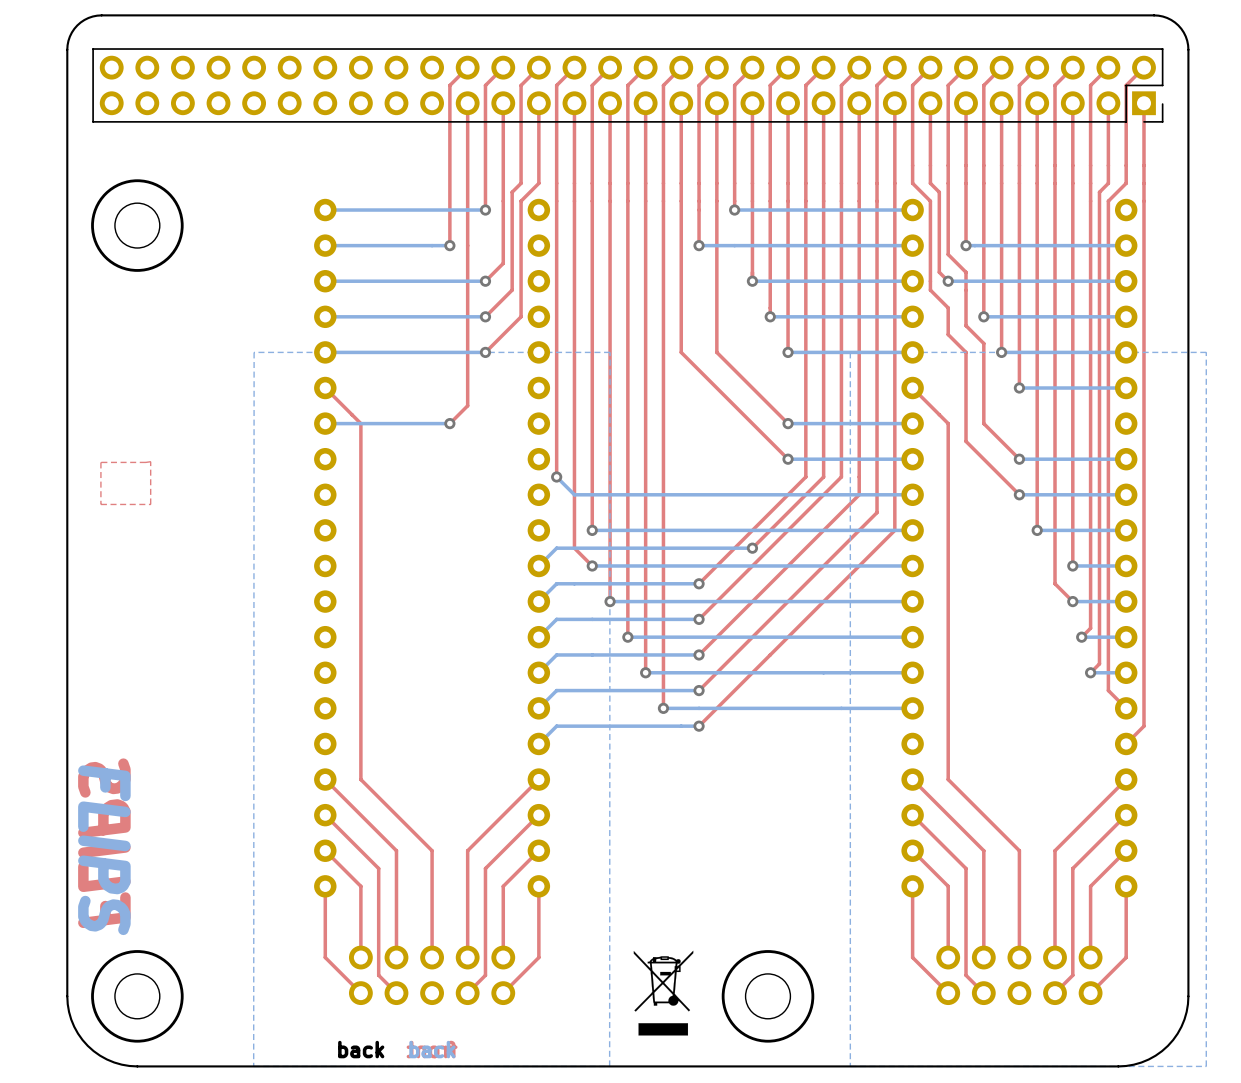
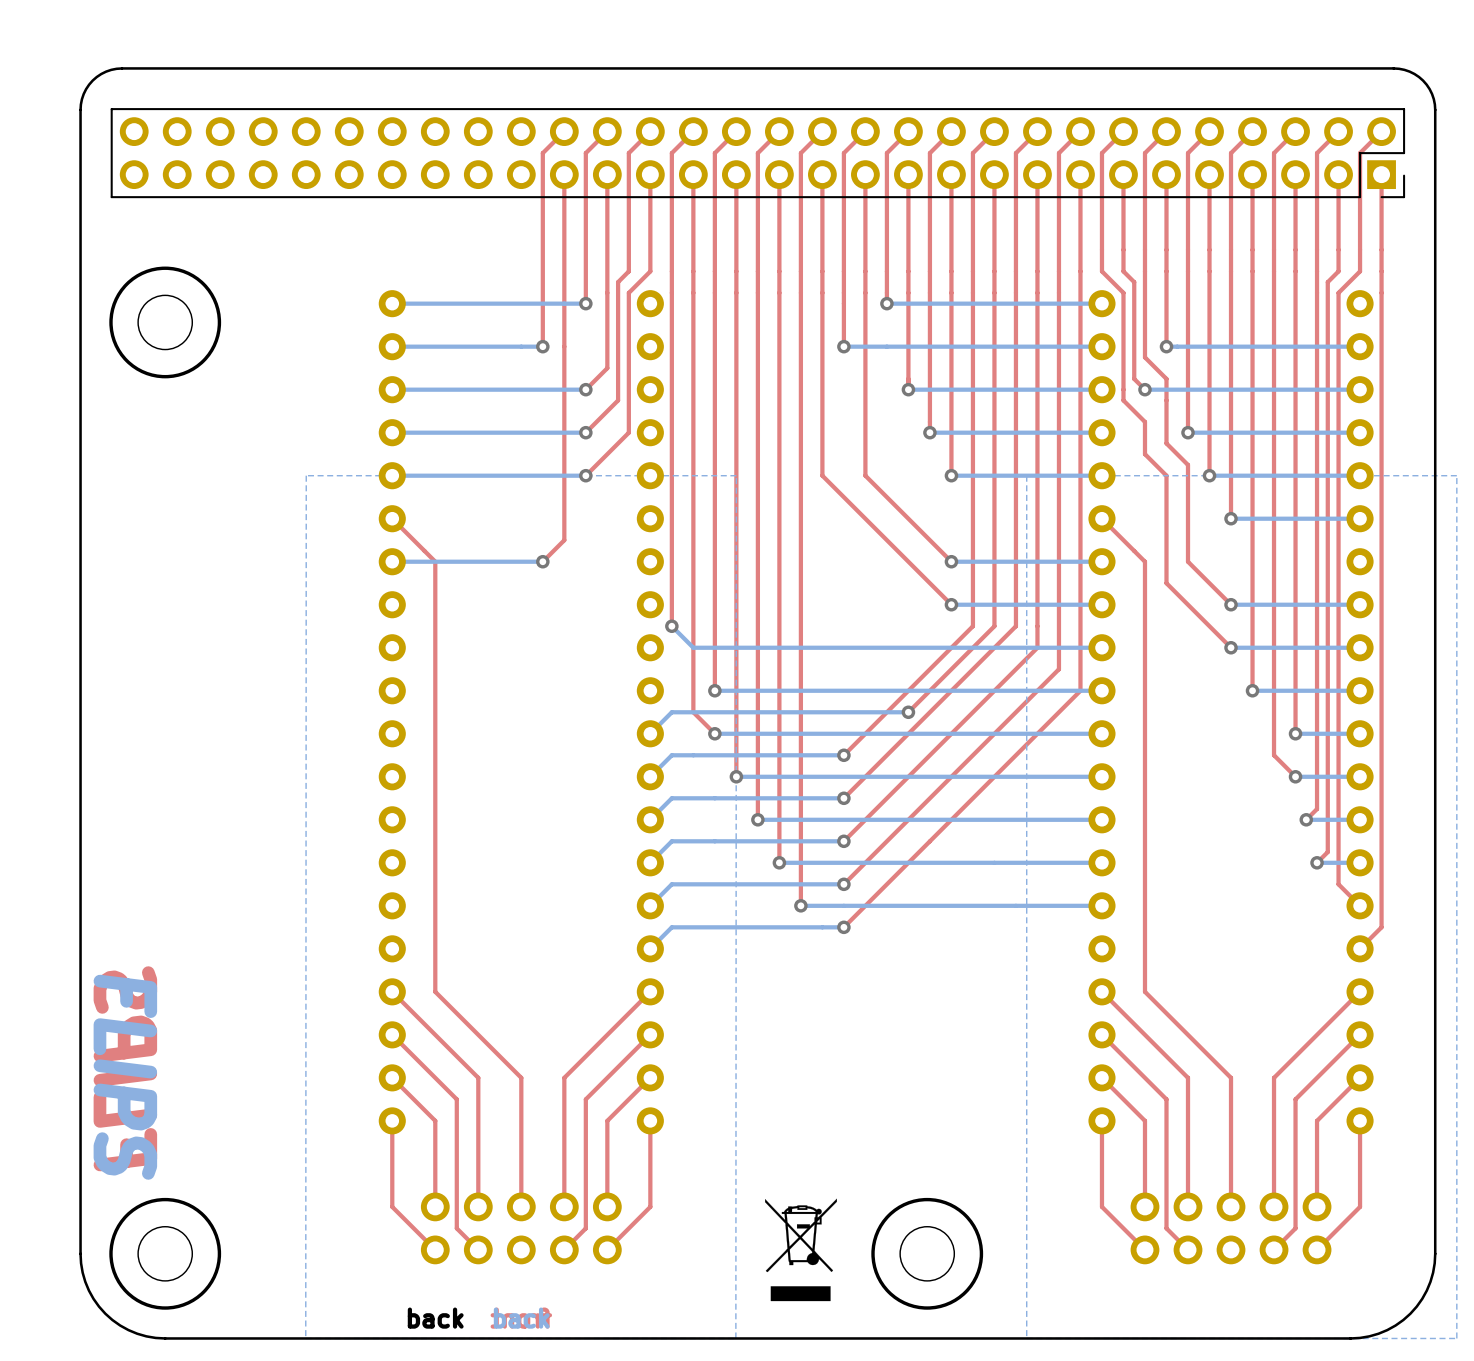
top zone outline: (150, 461) (100, 462) (100, 504) (150, 504) (150, 461) -> none

